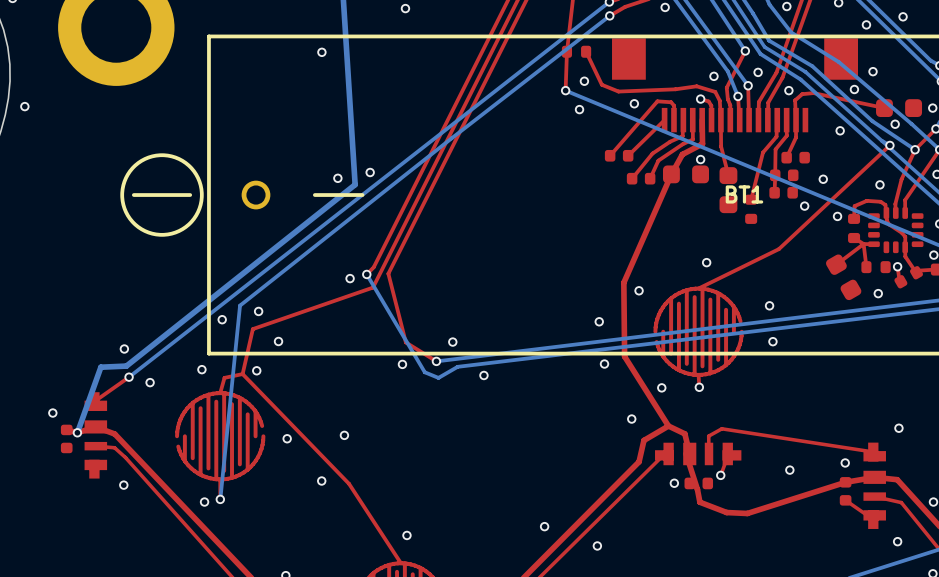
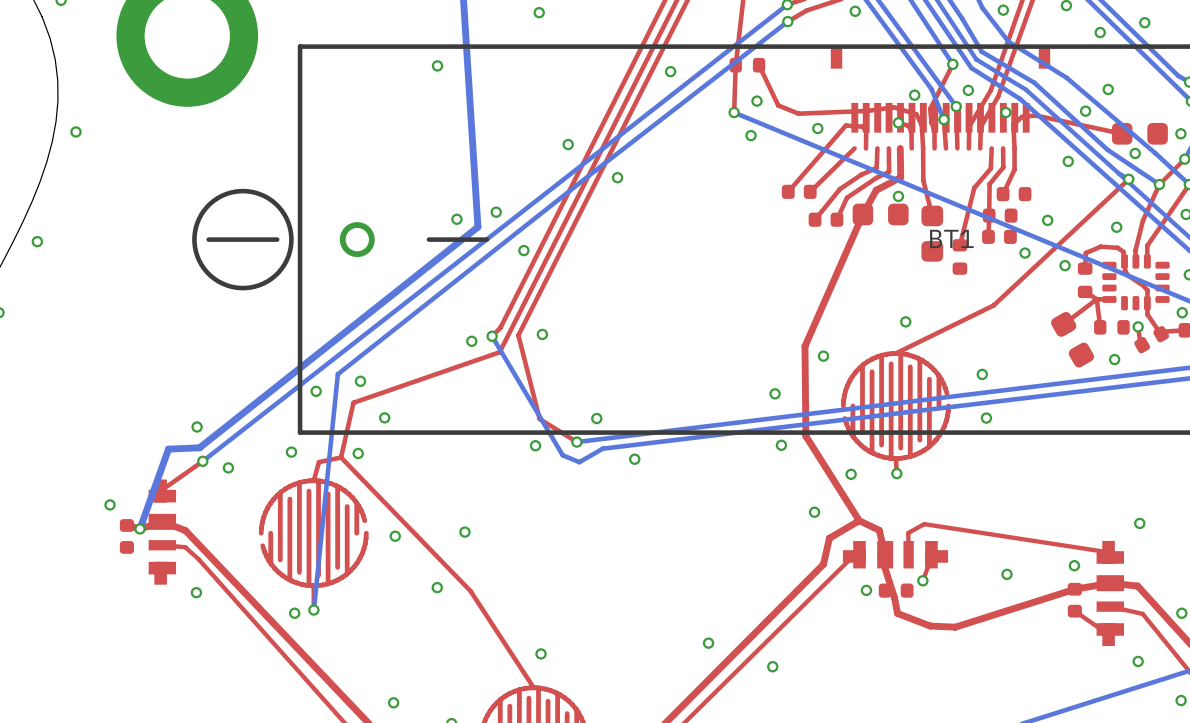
part footprint: [612, 38, 859, 133] -> [830, 45, 1051, 133]
via: none -> (670, 71)
via: none -> (568, 144)
via: none -> (617, 177)
via: none -> (523, 250)
via: none -> (542, 334)

